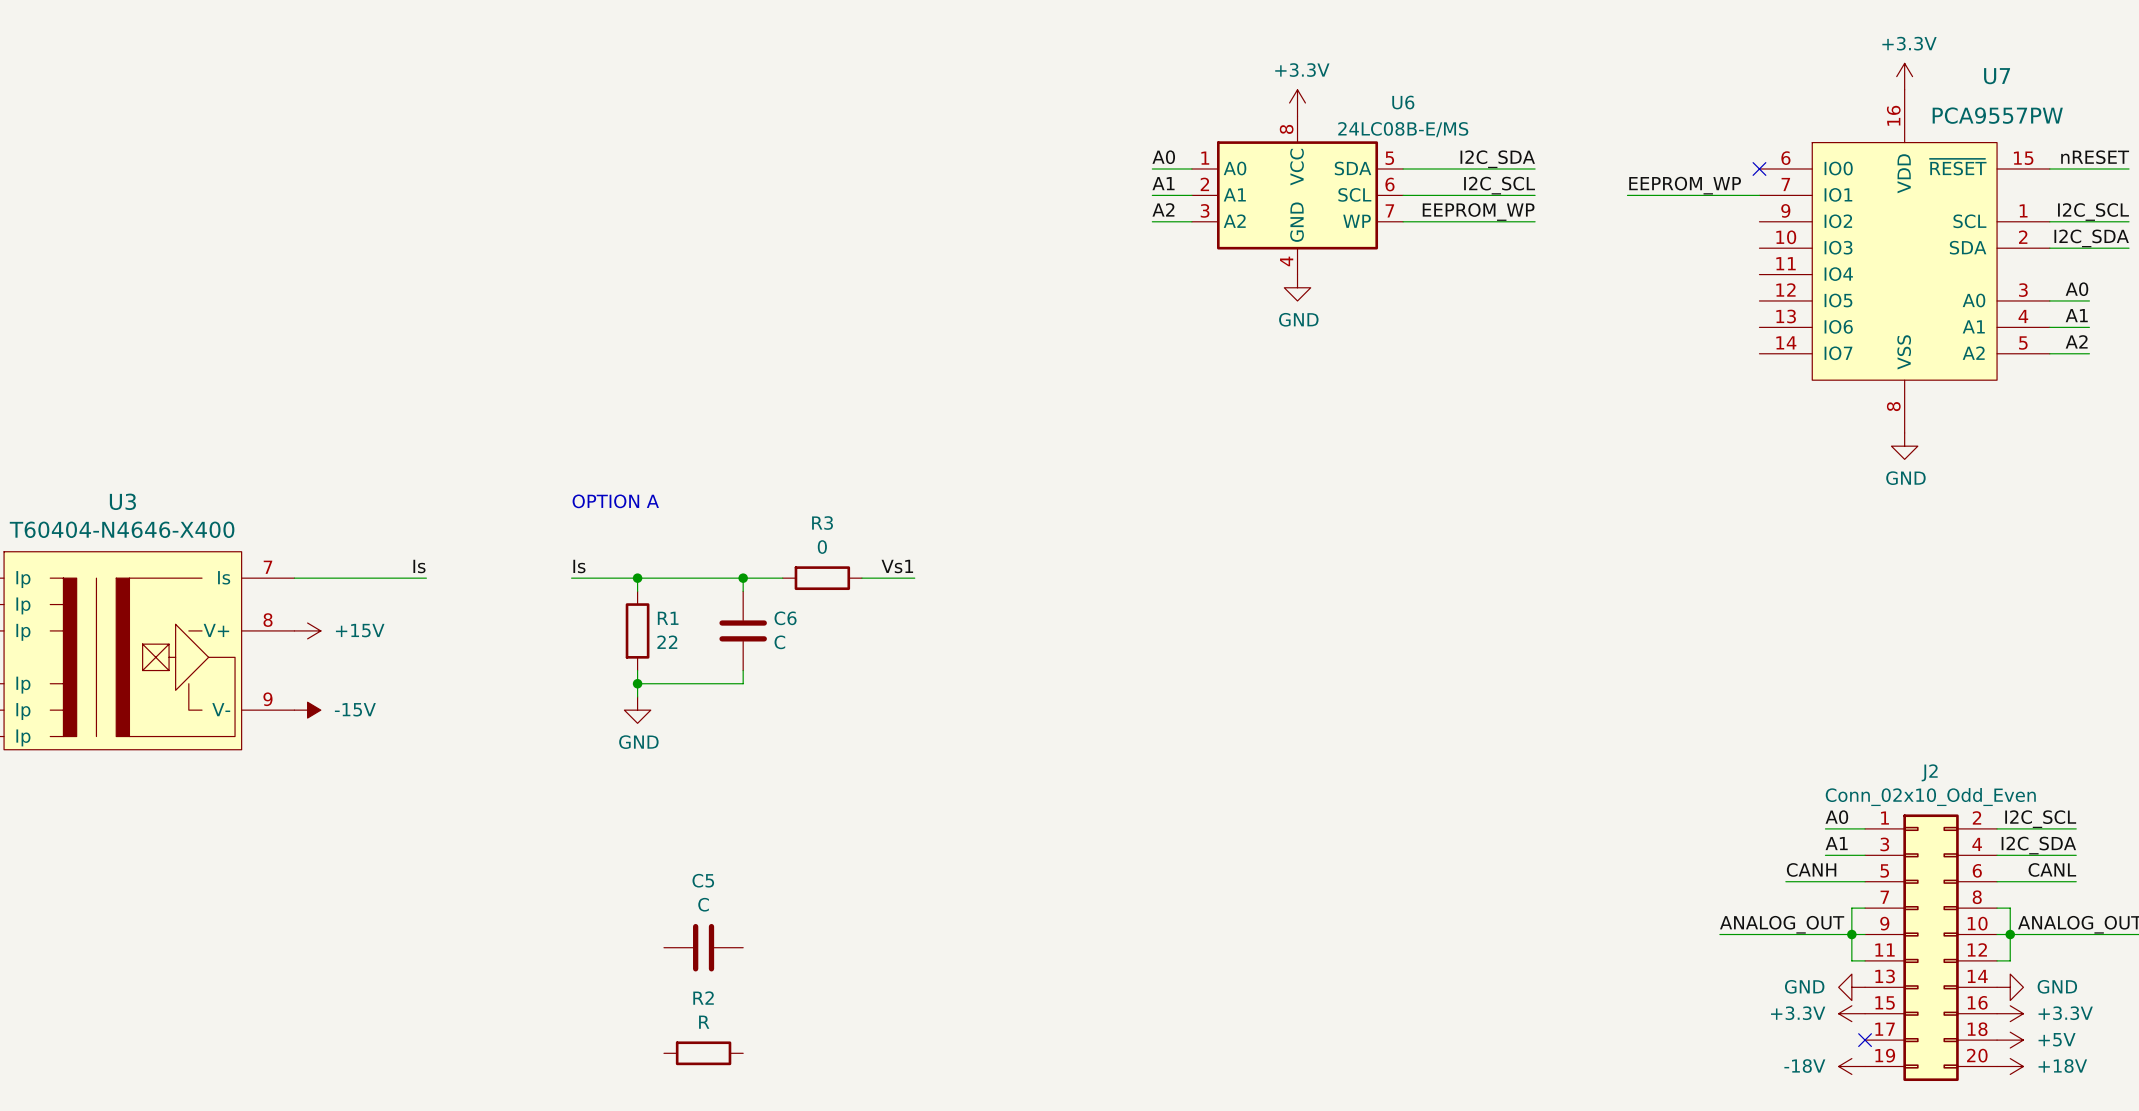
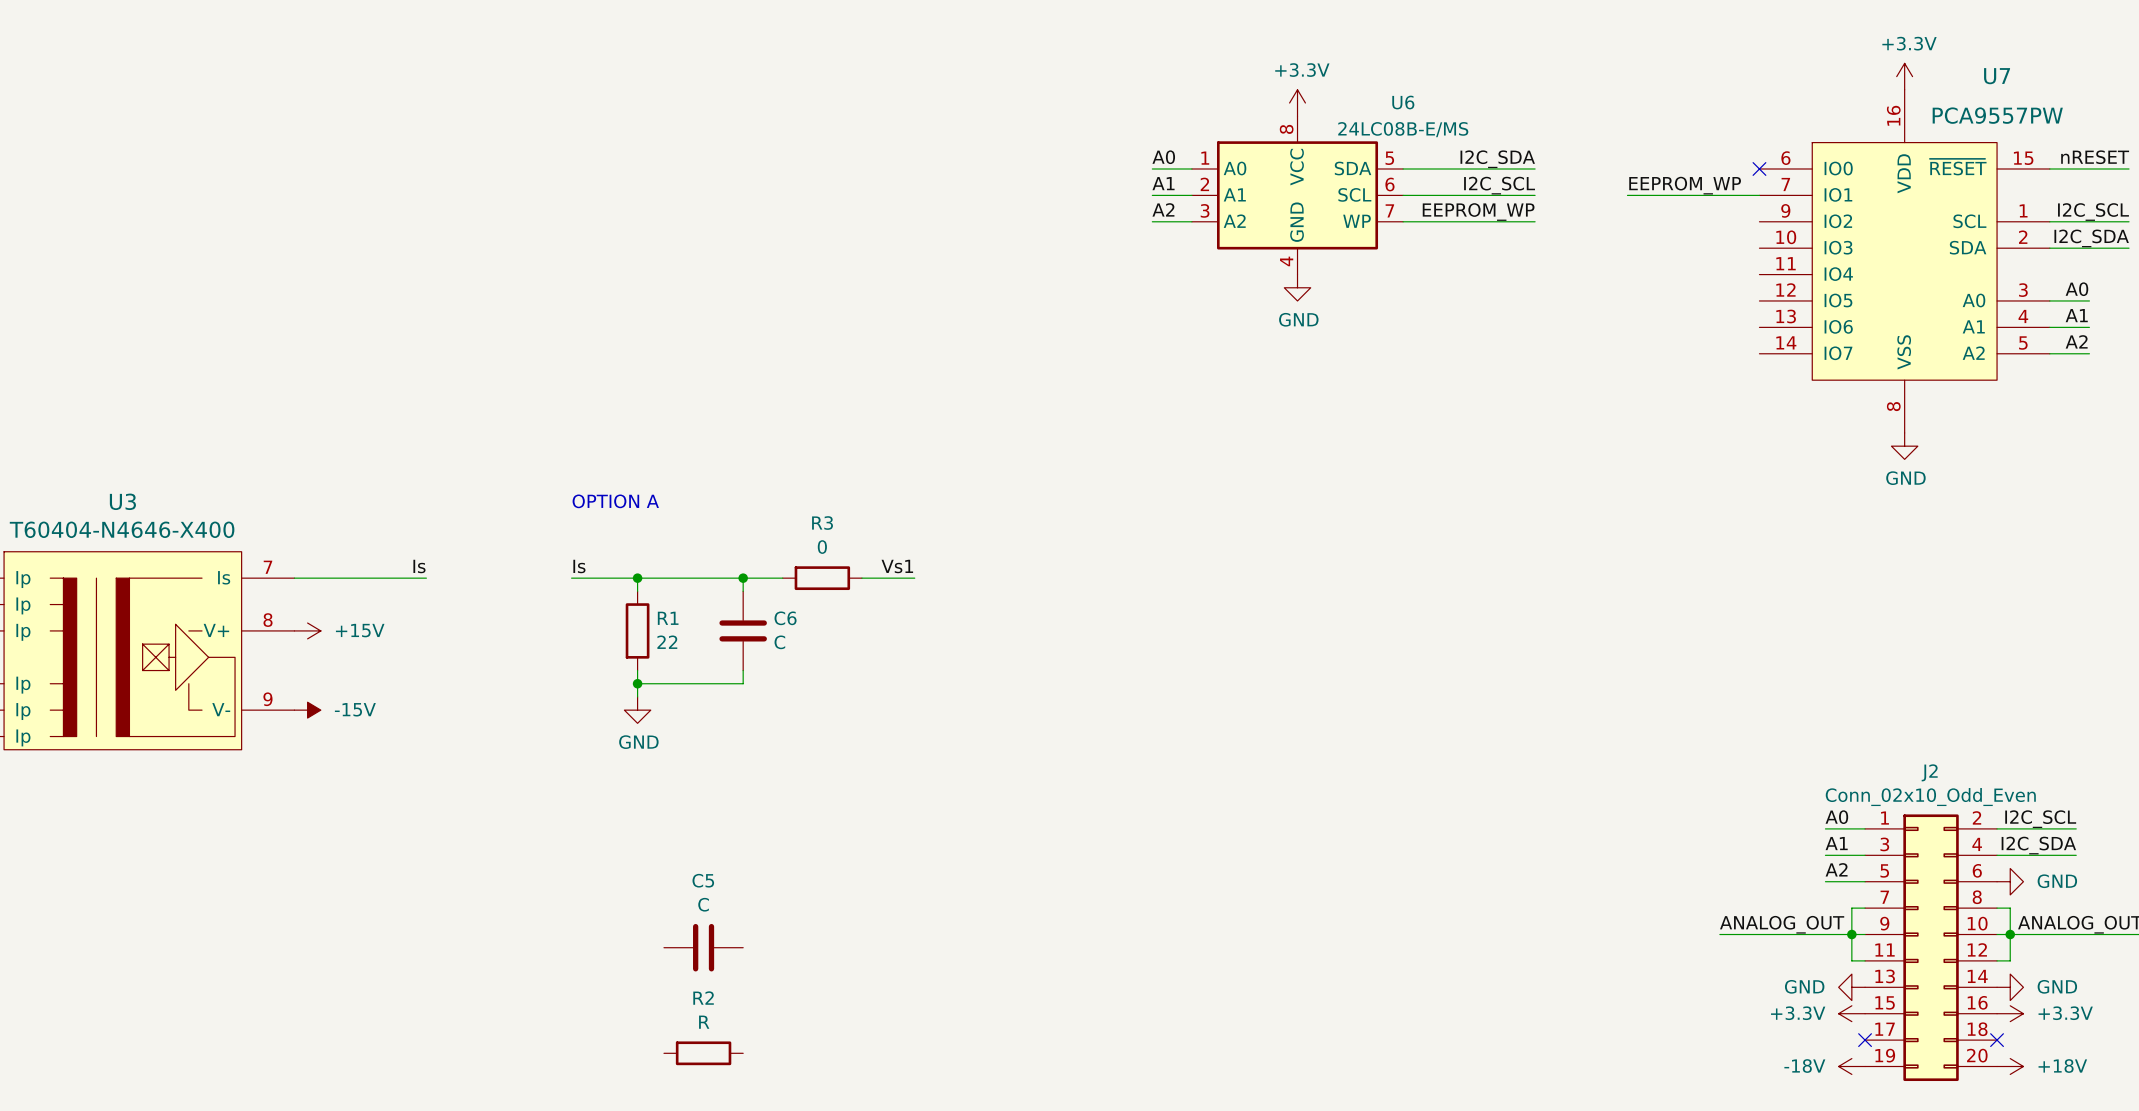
label: CANH (1811, 869) -> none
label: none -> A2 (1836, 869)
label: CANL (2052, 869) -> none
wire: (1785, 881) (1825, 881) -> none
wire: (1997, 881) (2076, 881) -> none
power symbol: none -> GND (2010, 881)
no-connect mark: none -> (1997, 1040)
power symbol: +5V (2010, 1040) -> none

